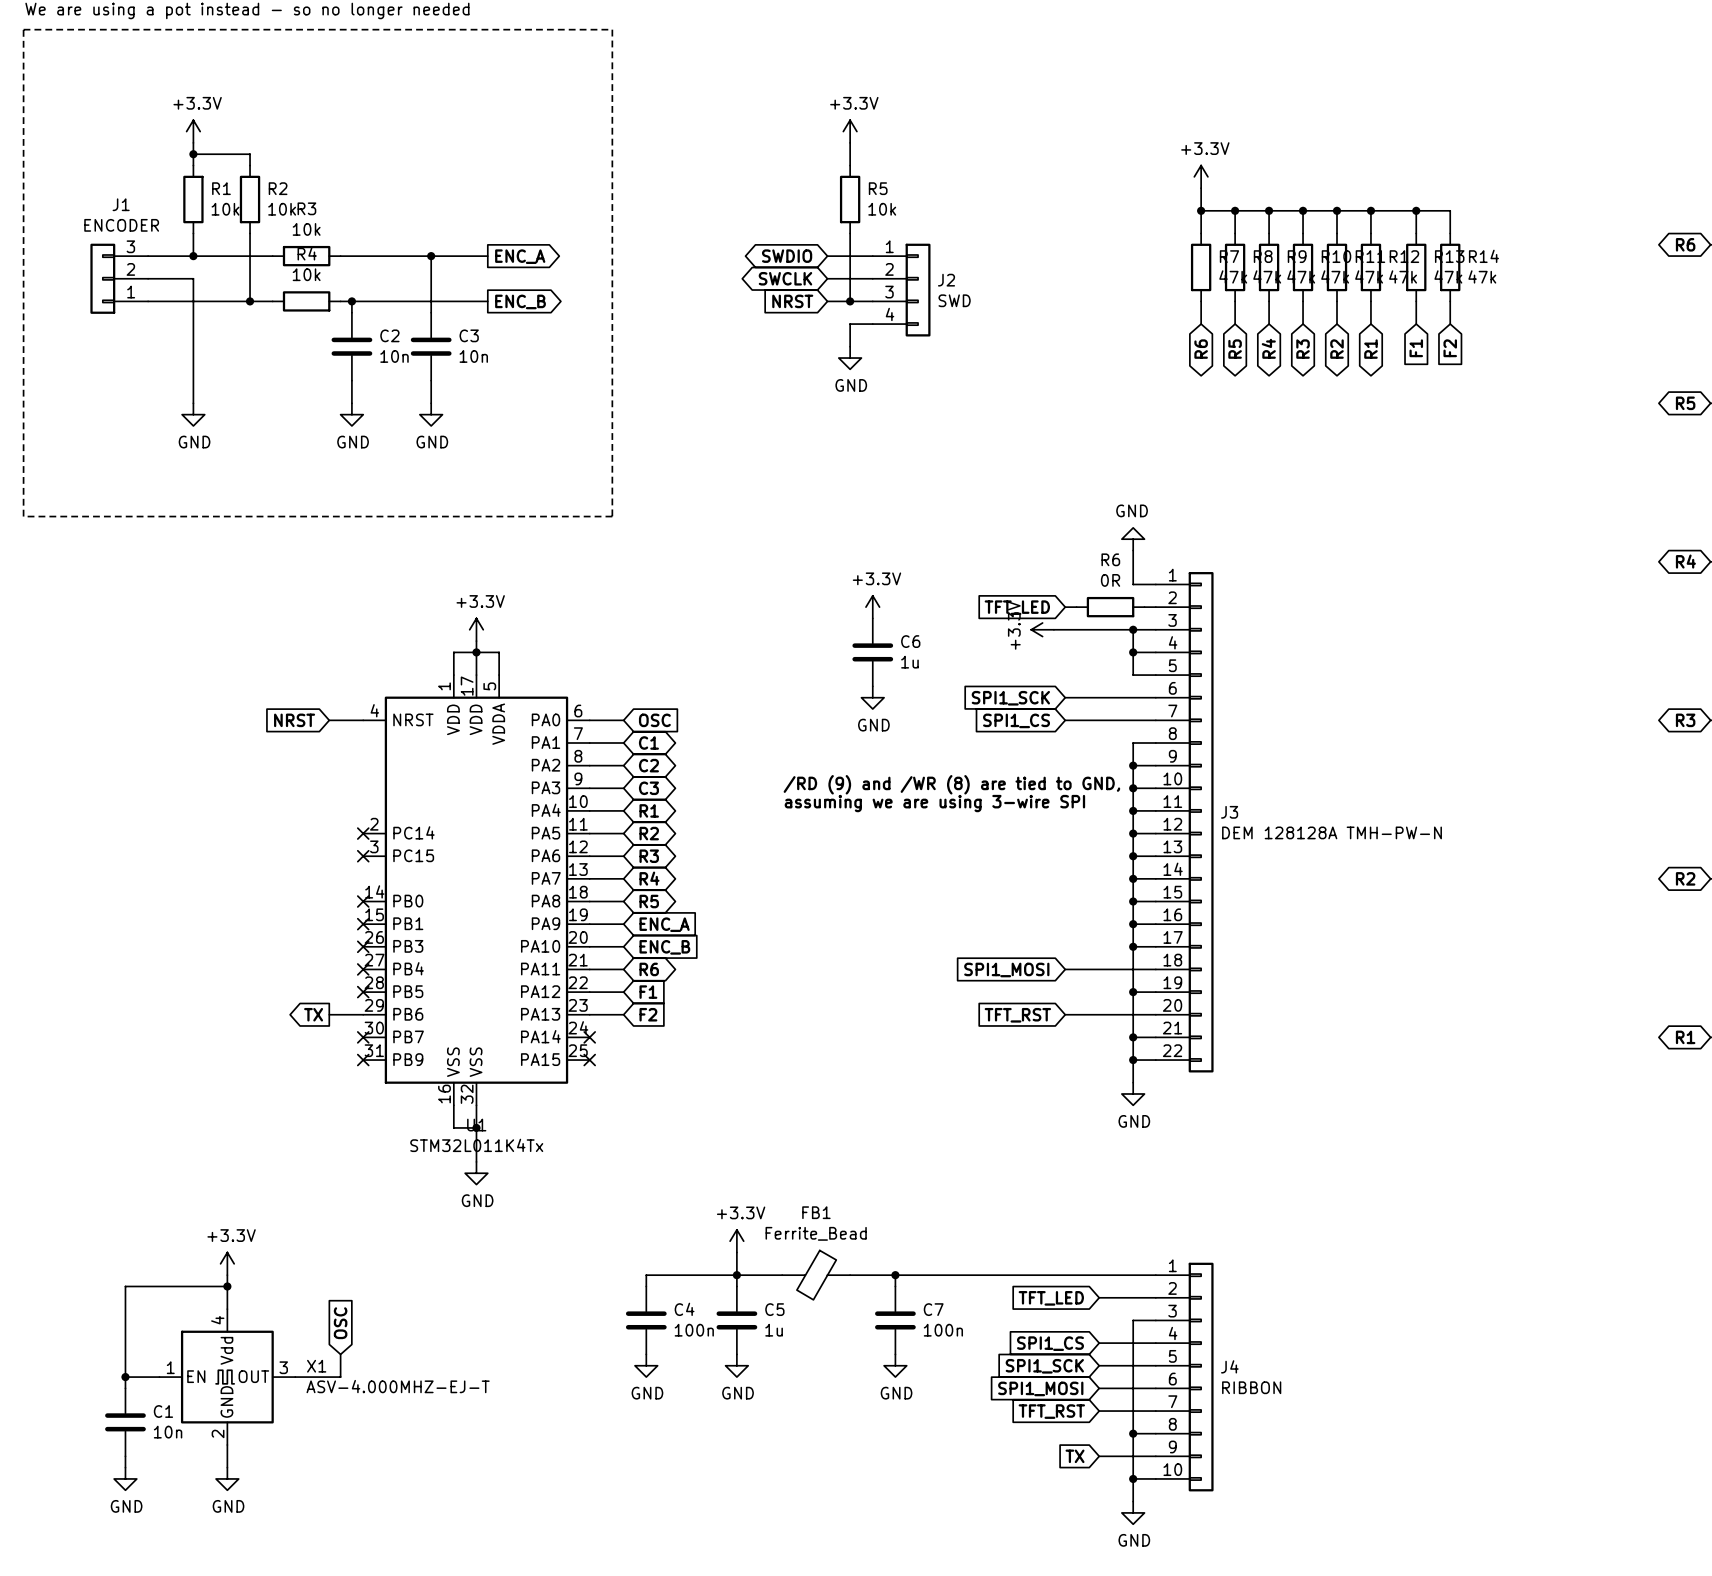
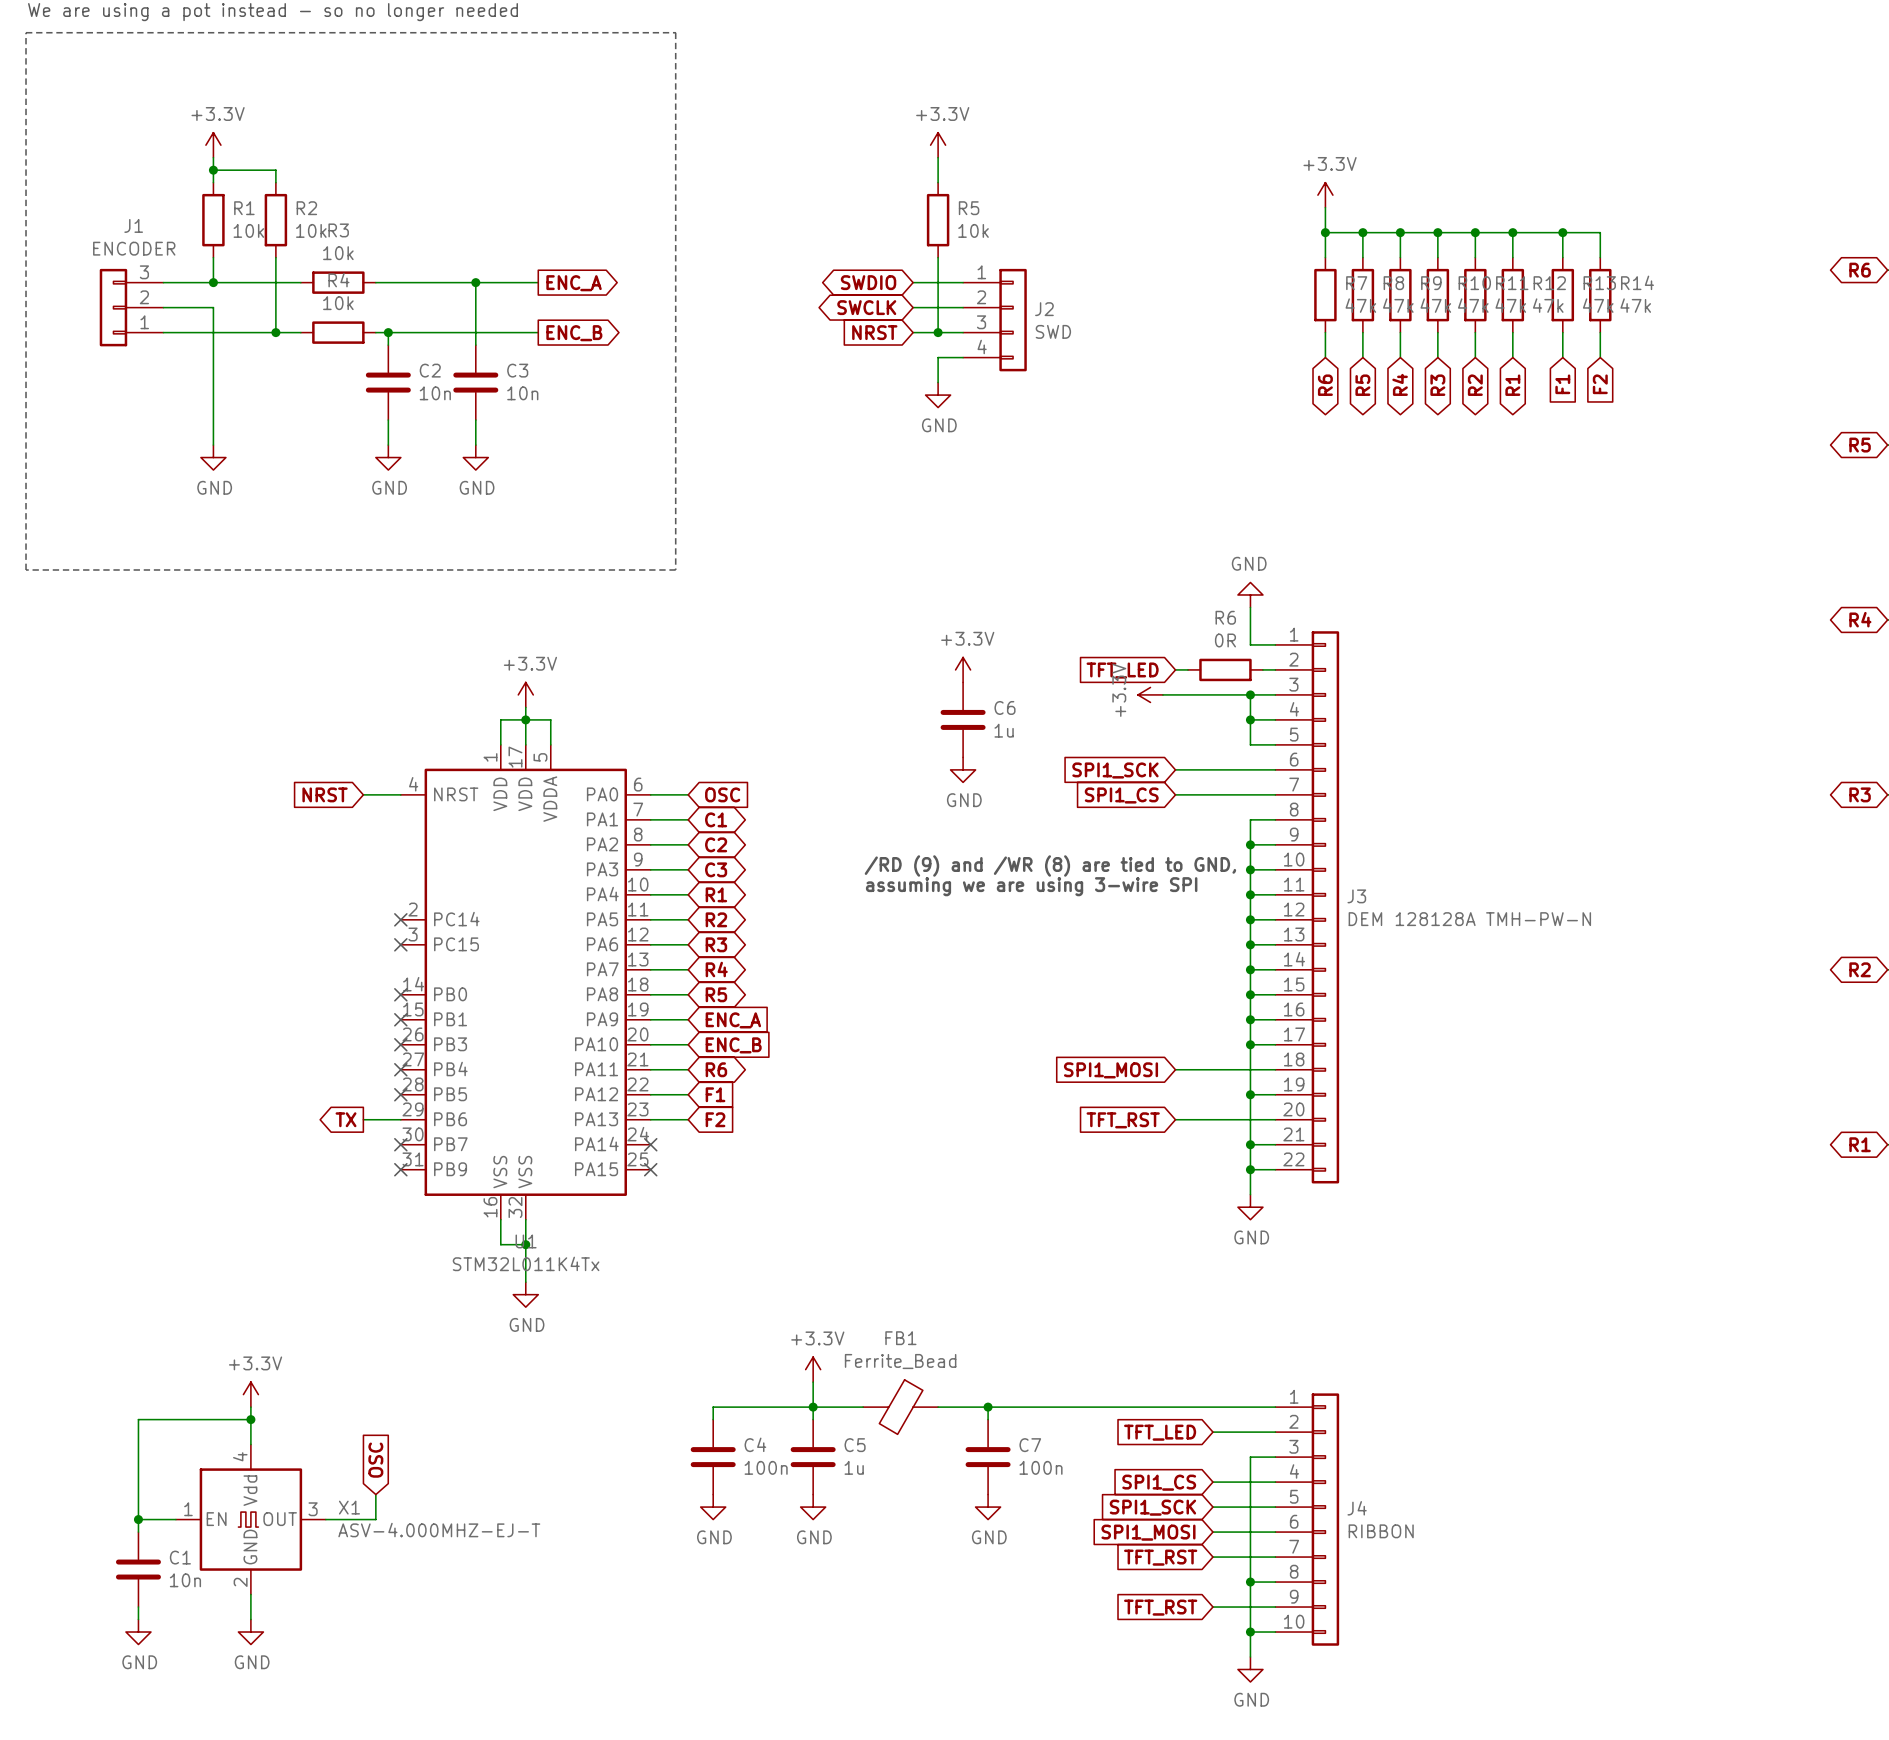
global label: TX (1075, 1456) -> TFT_RST (1160, 1607)

